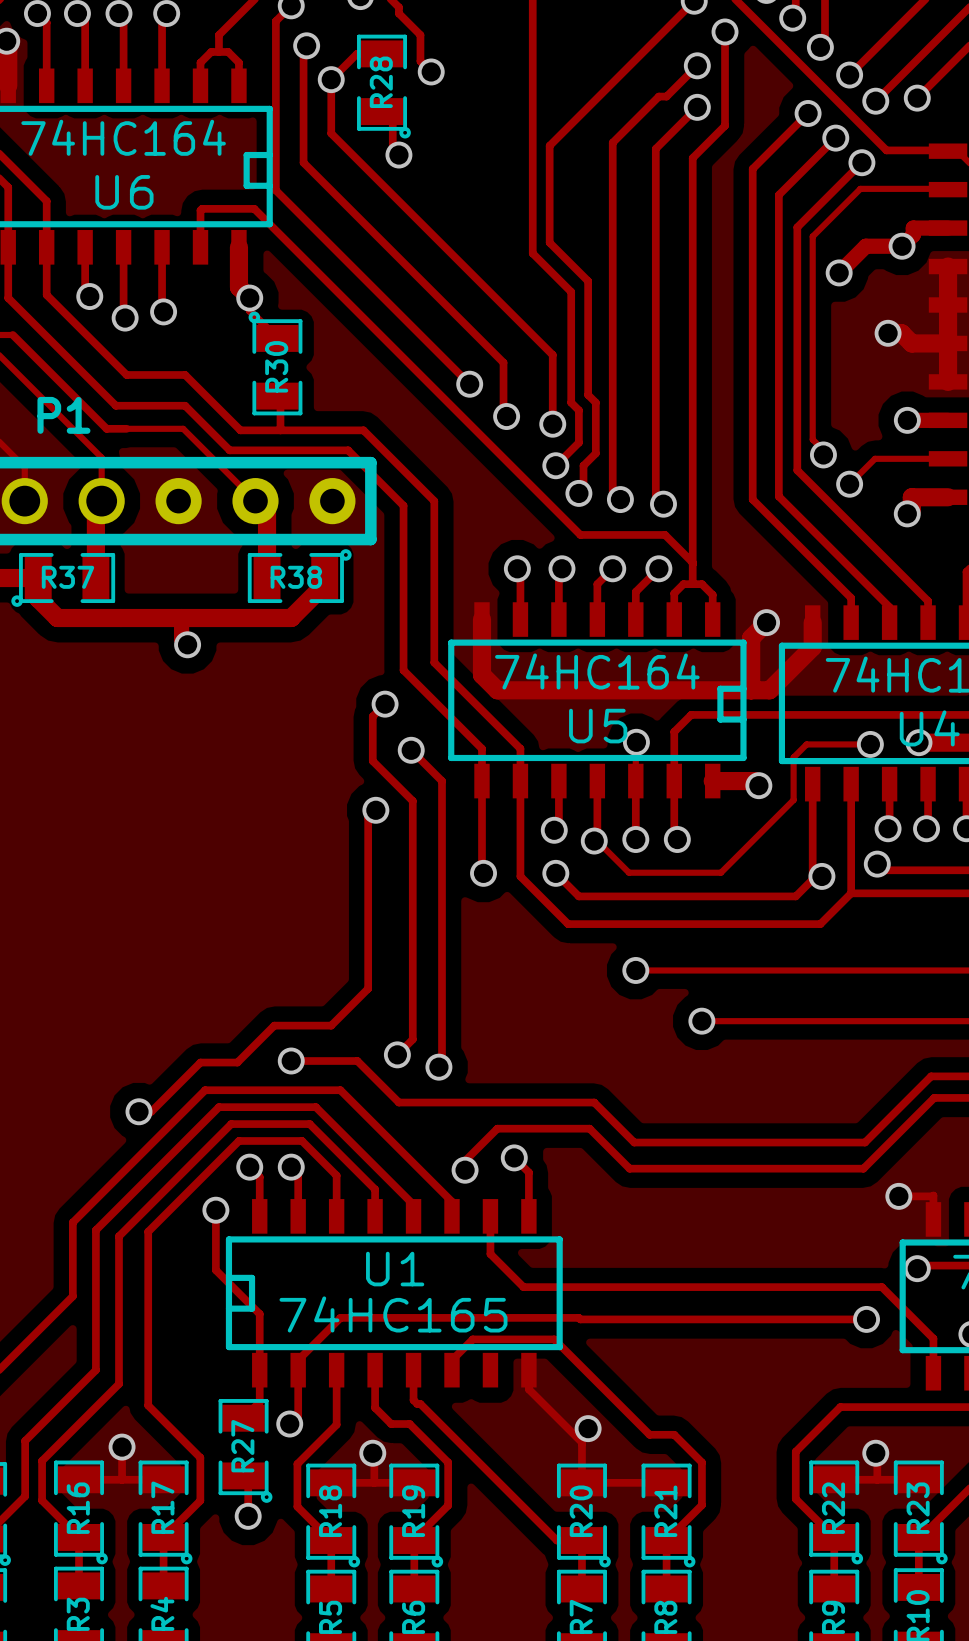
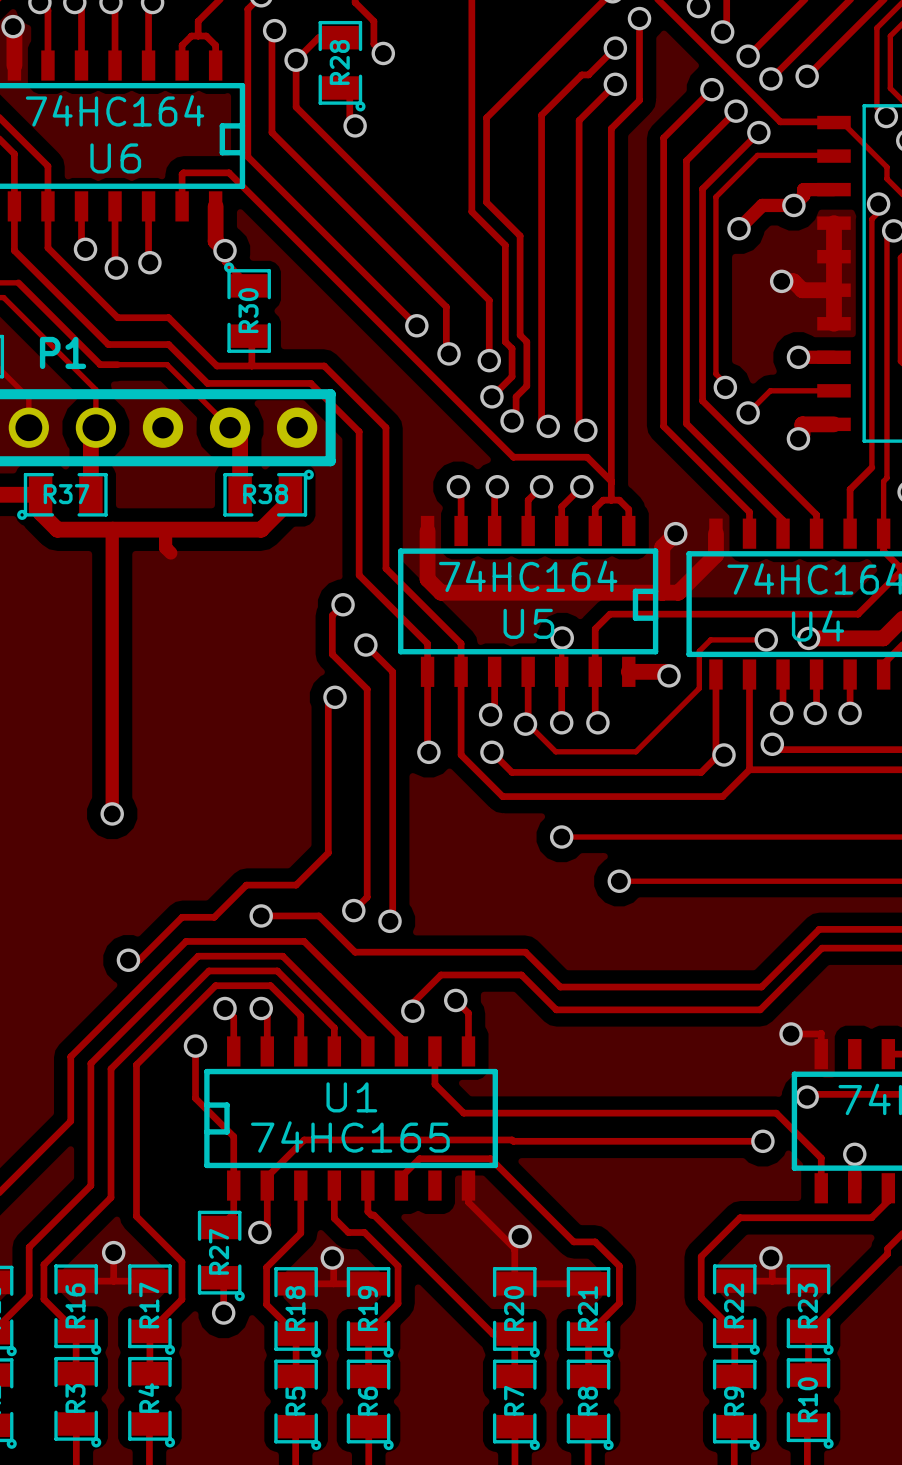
track: none -> (112, 529) (112, 813)
via: (187, 644) -> none
via: none -> (112, 813)

